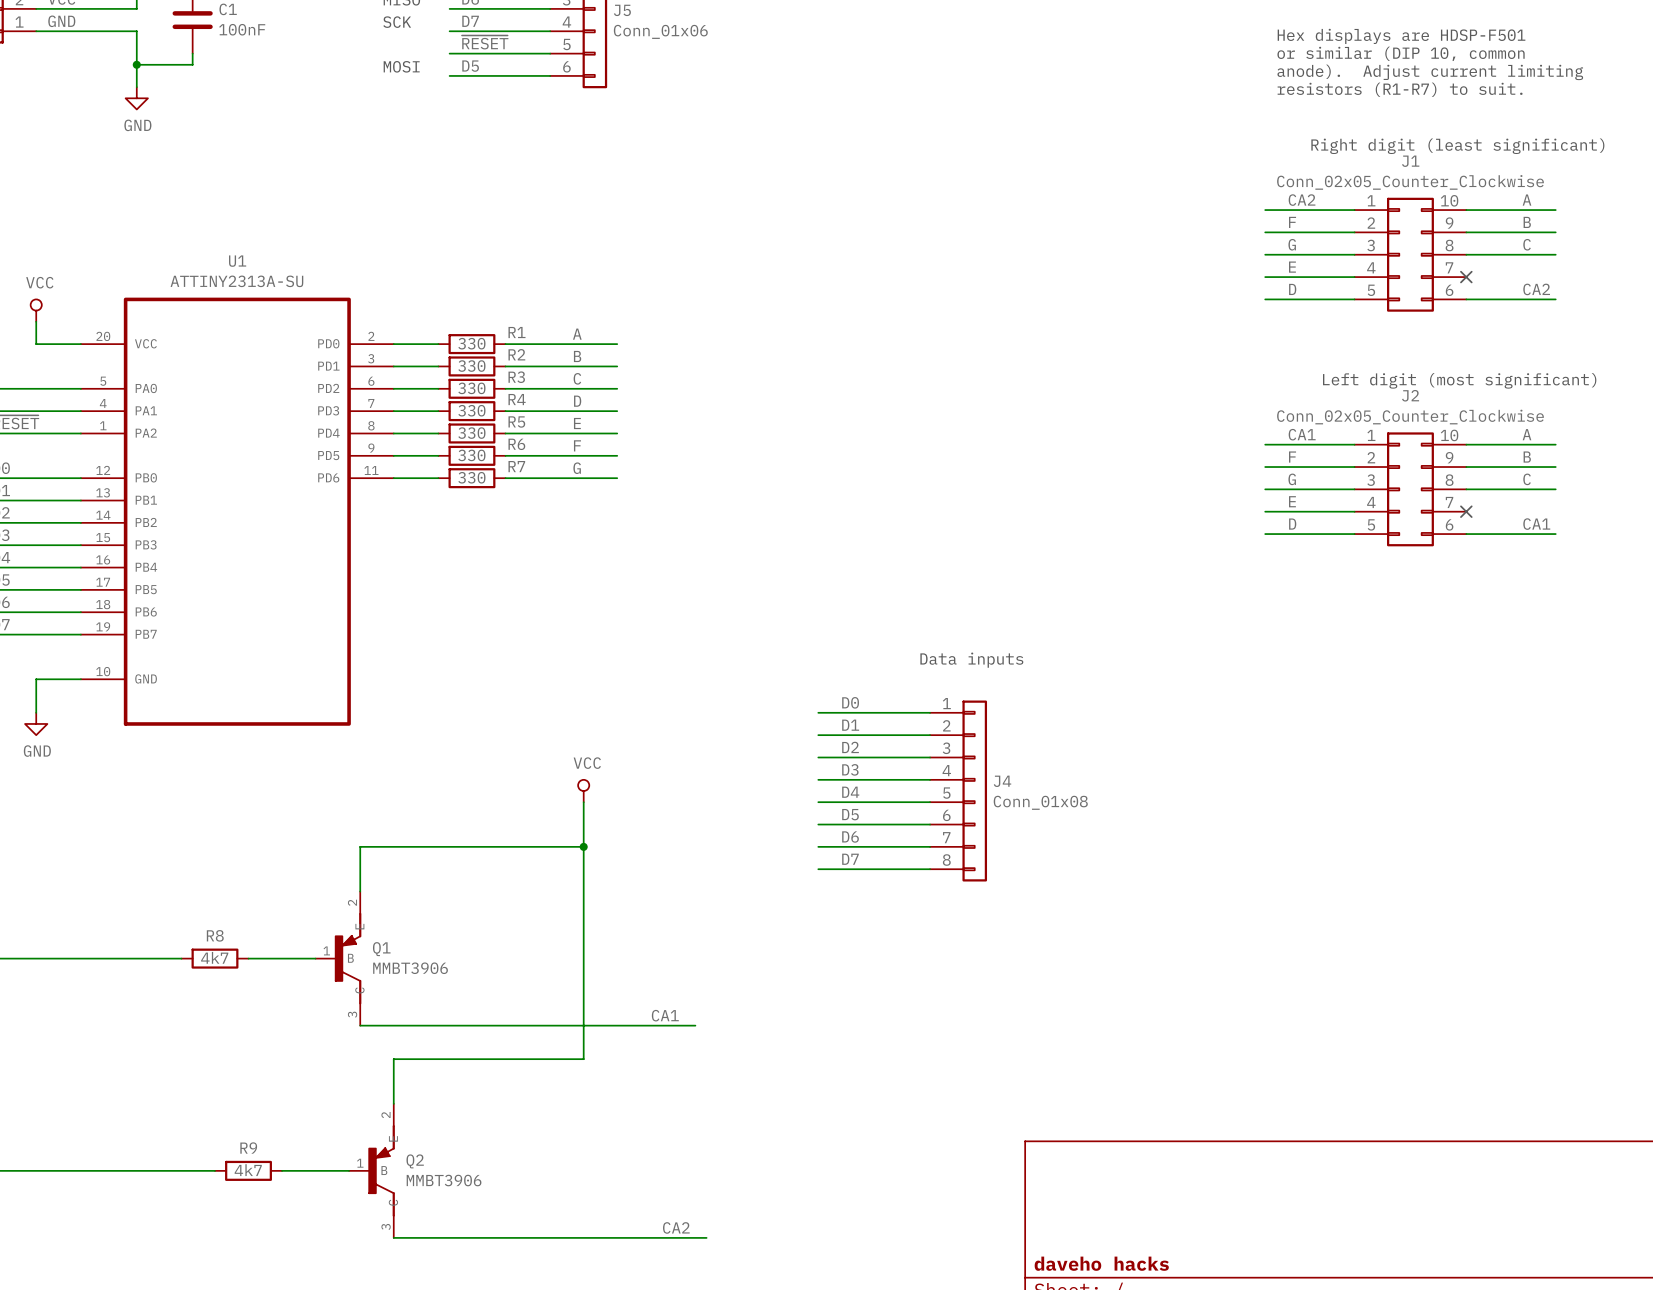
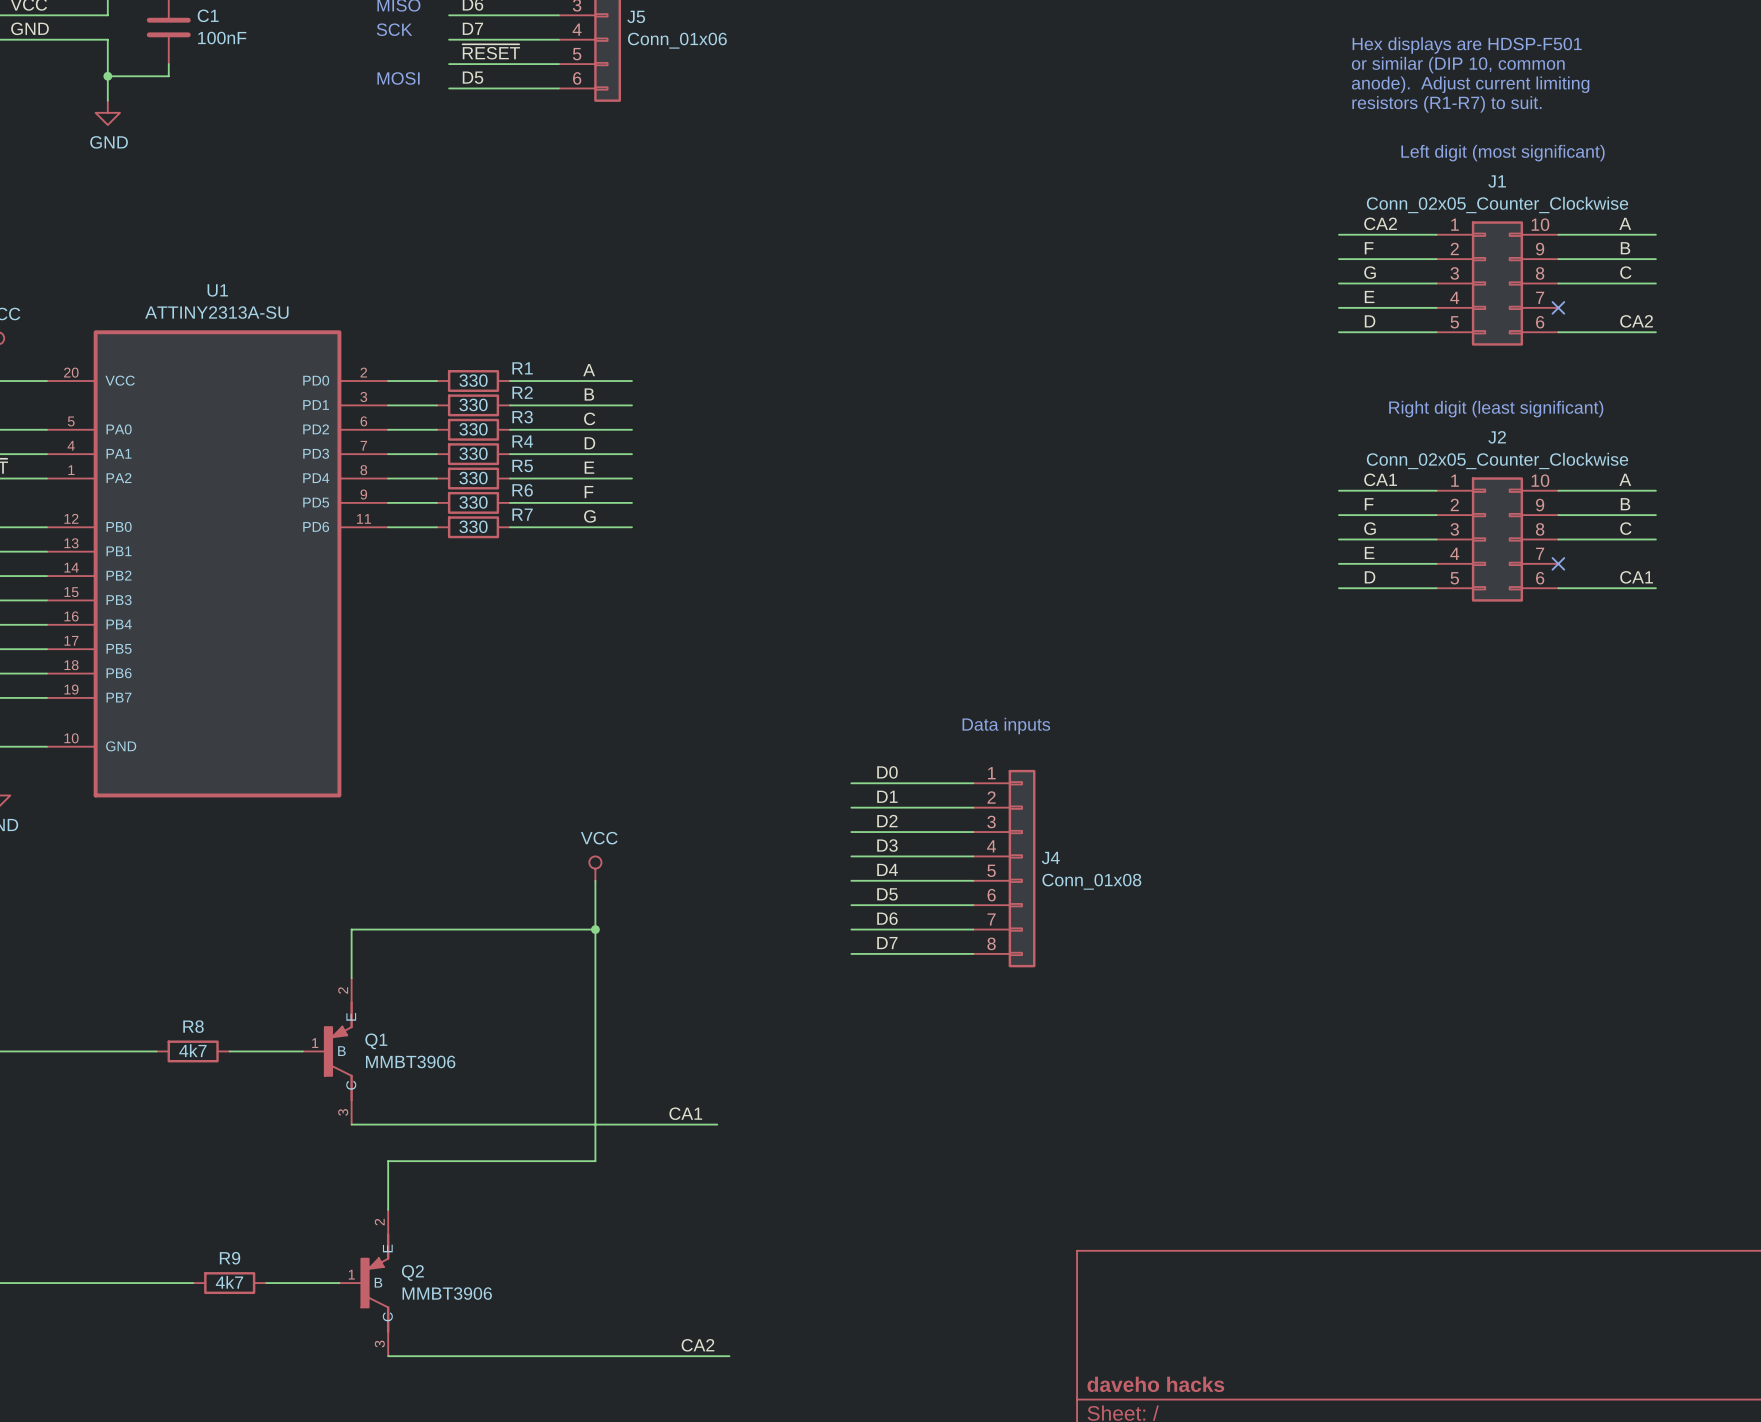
text: Right digit (least significant) (1457, 146) -> Left digit (most significant) (1503, 153)
text: Left digit (most significant) (1459, 380) -> Right digit (least significant) (1496, 409)

